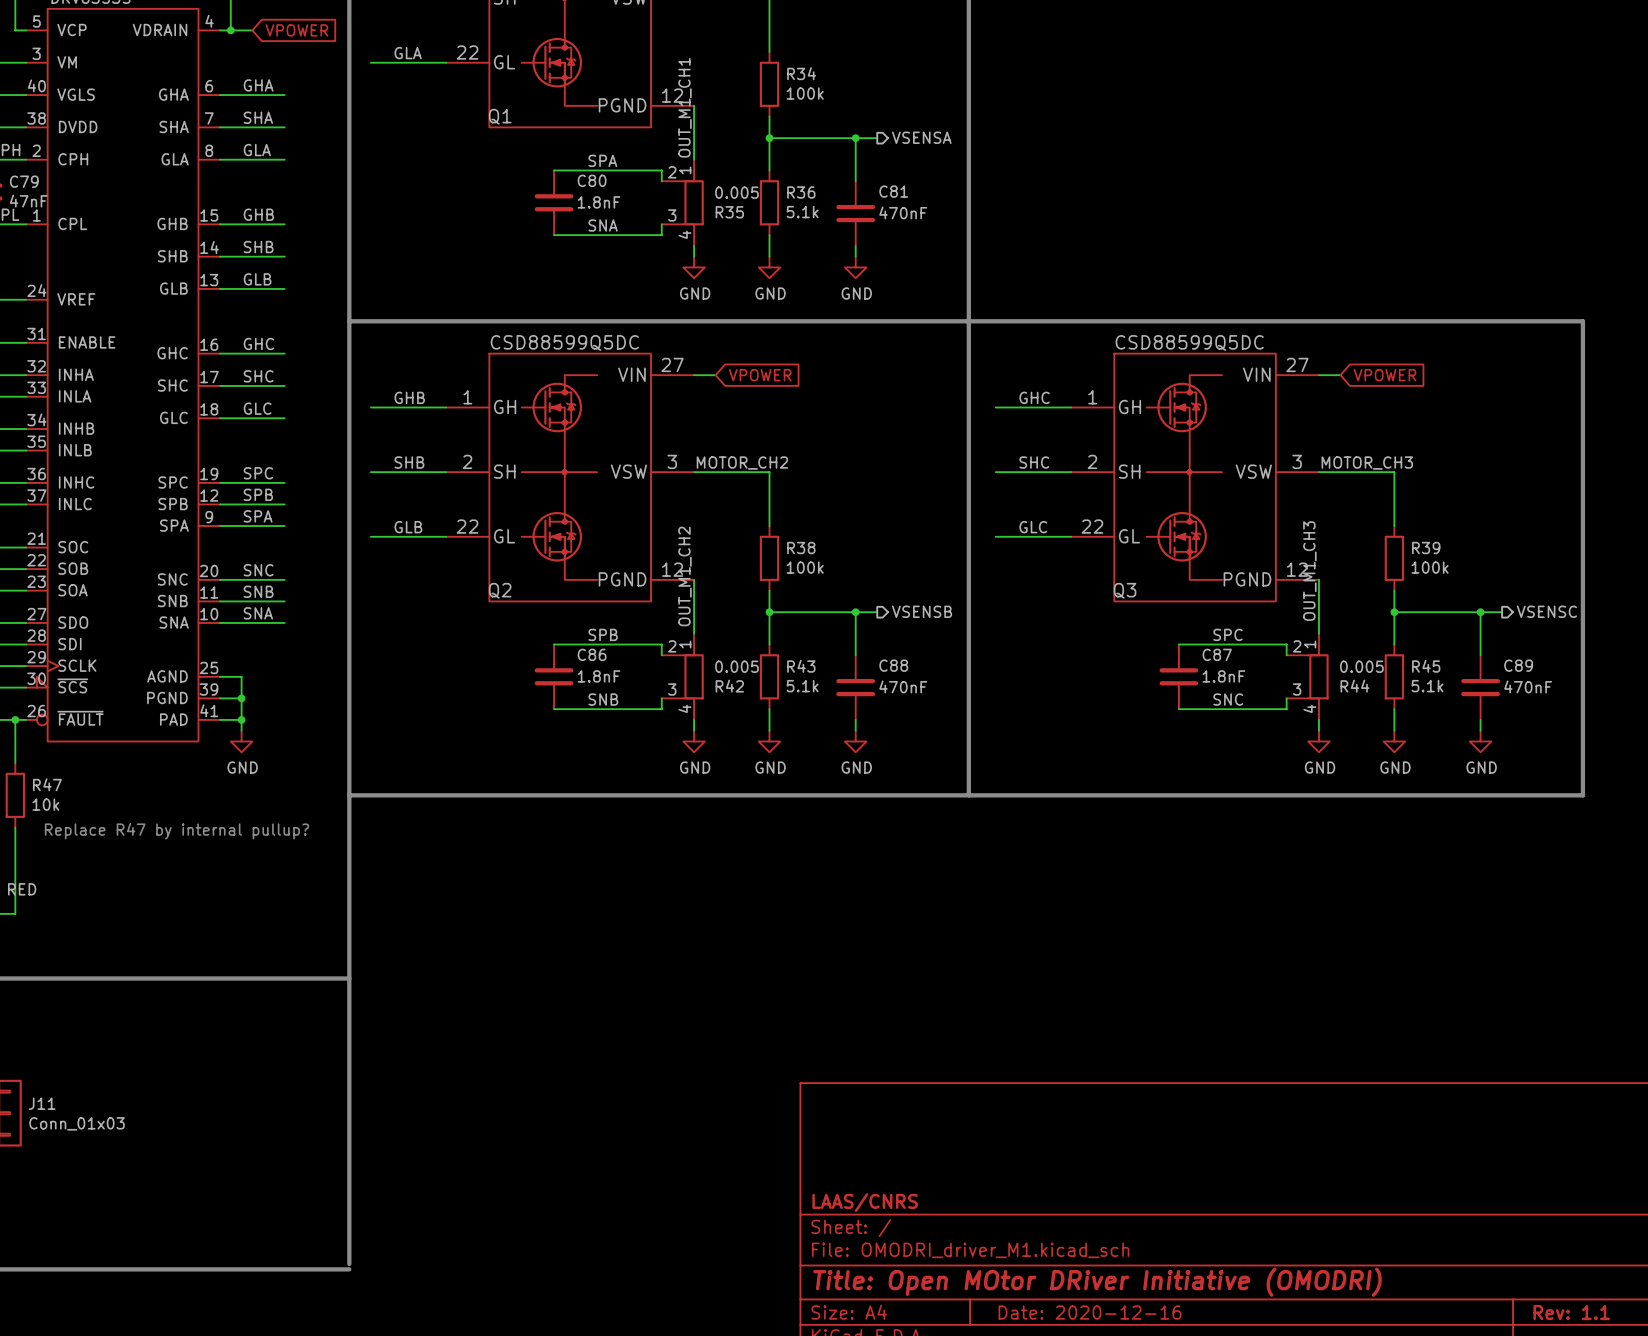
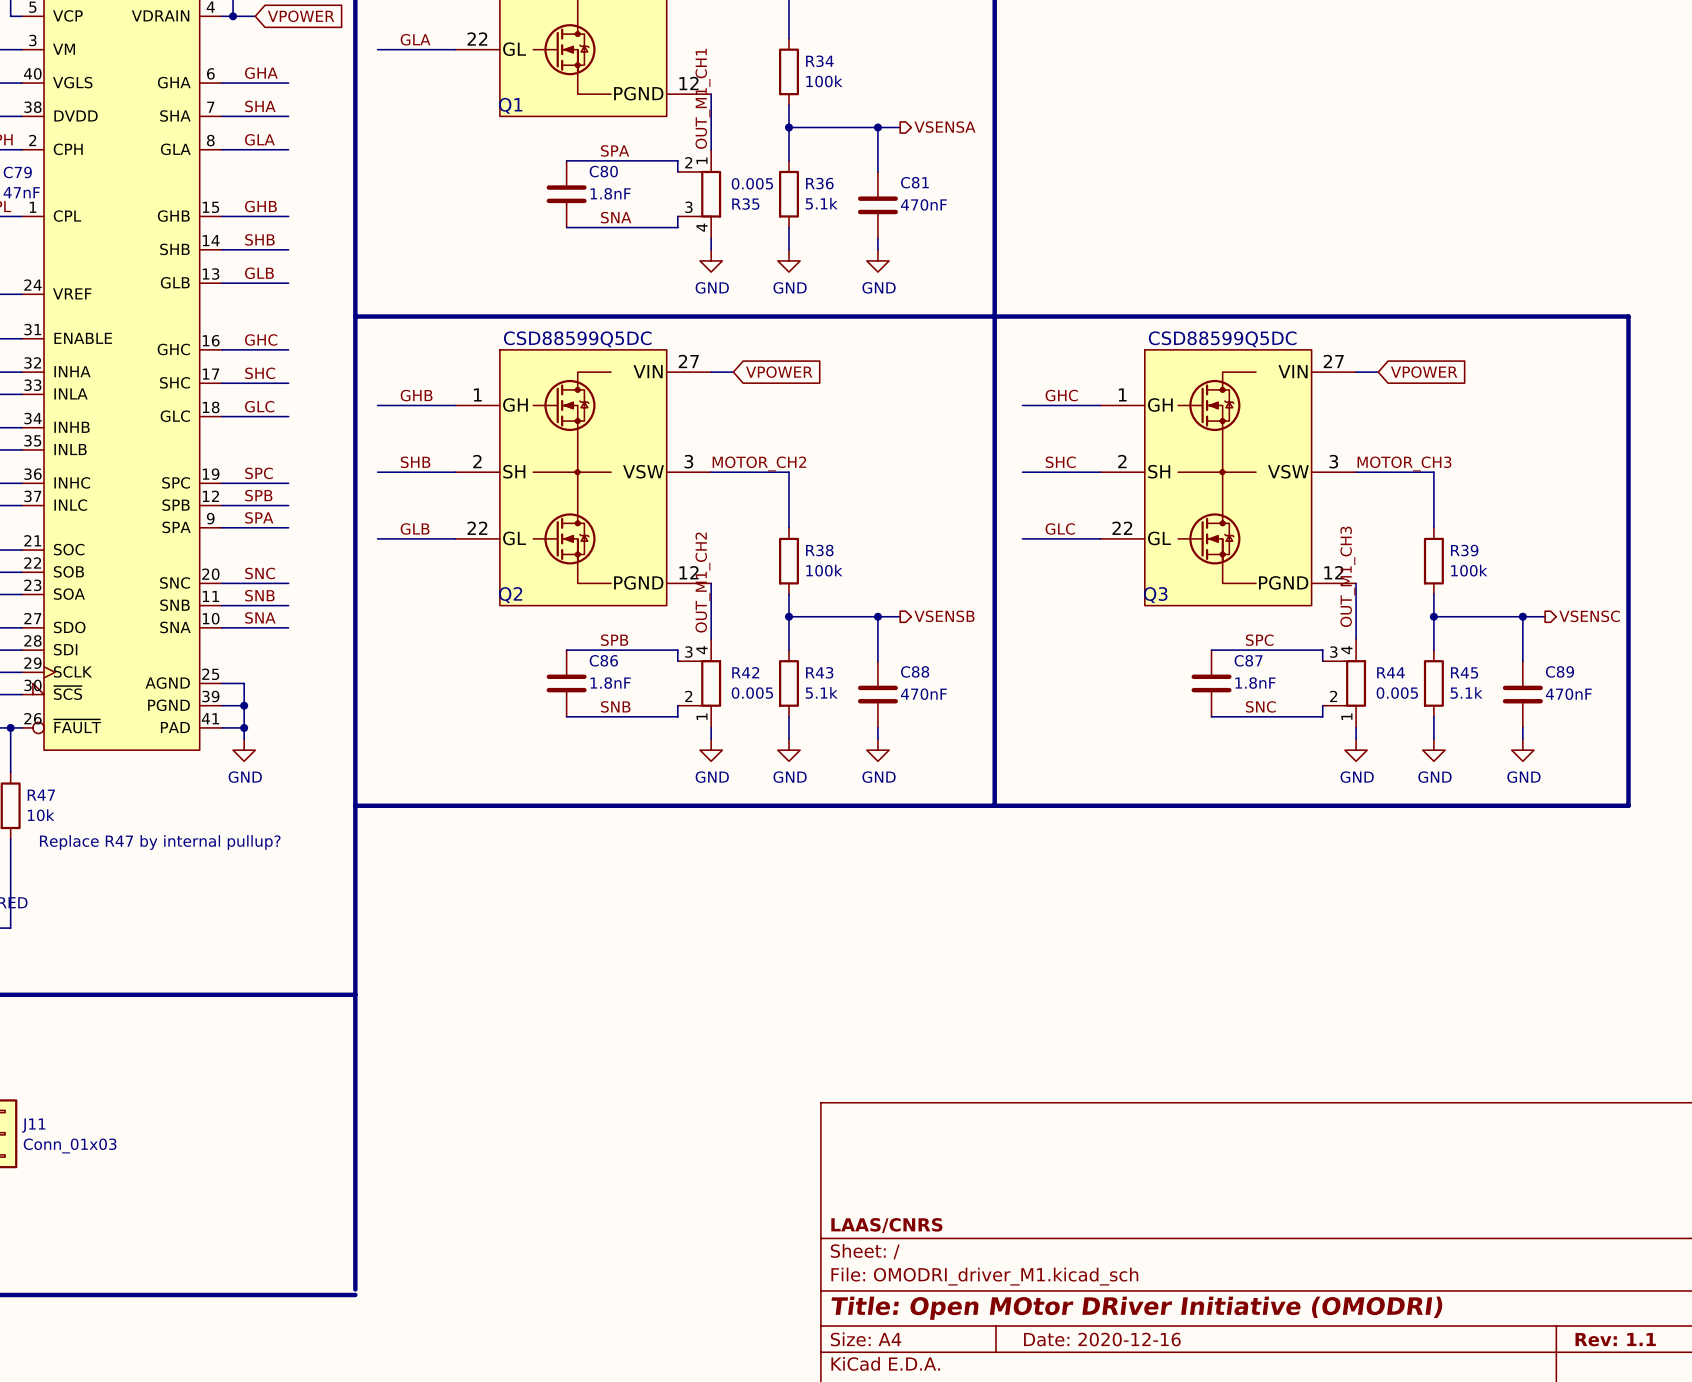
R42 flip: as is (693, 676) -> up-down (710, 683)
R44 flip: as is (1318, 676) -> up-down (1355, 683)

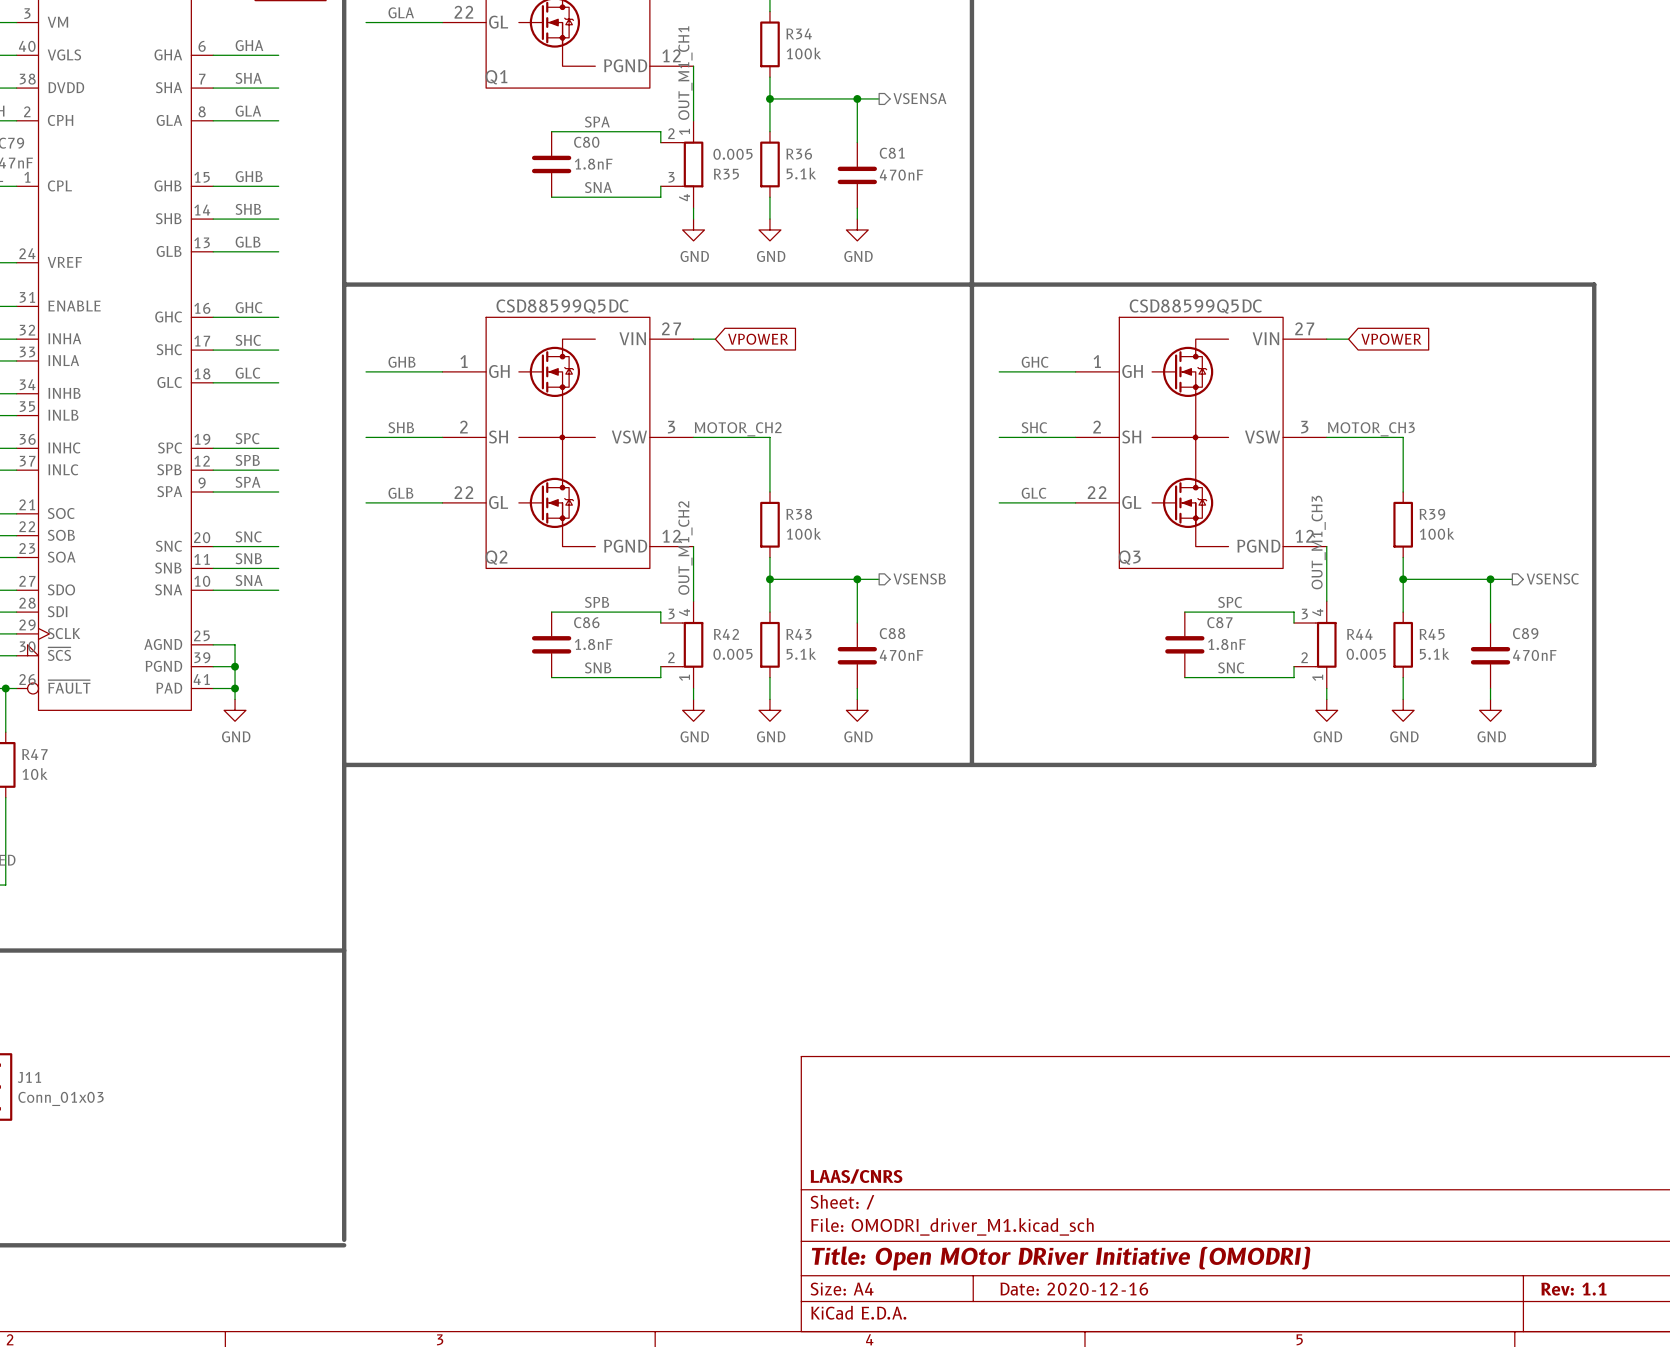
text: Replace R47 by internal pullup? (160, 842) -> none

